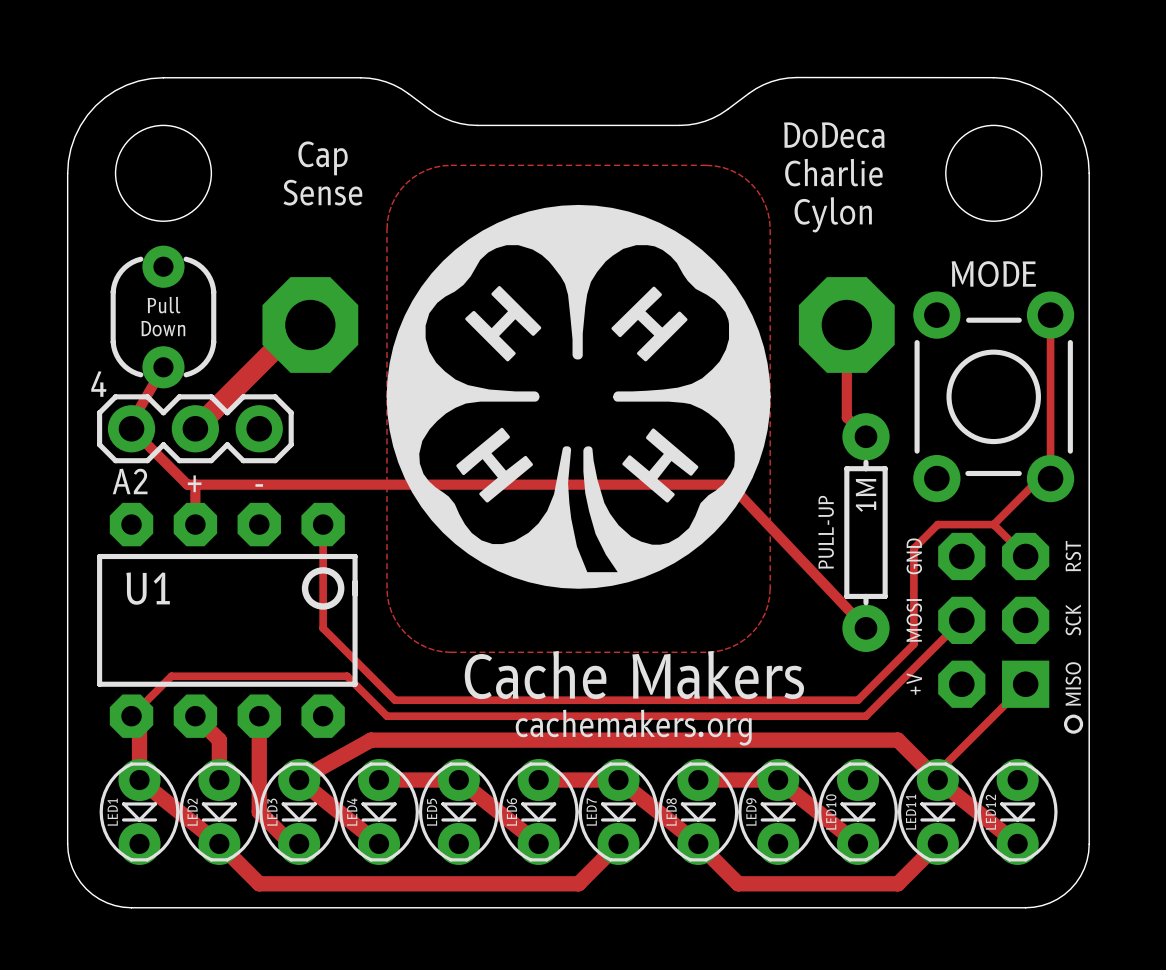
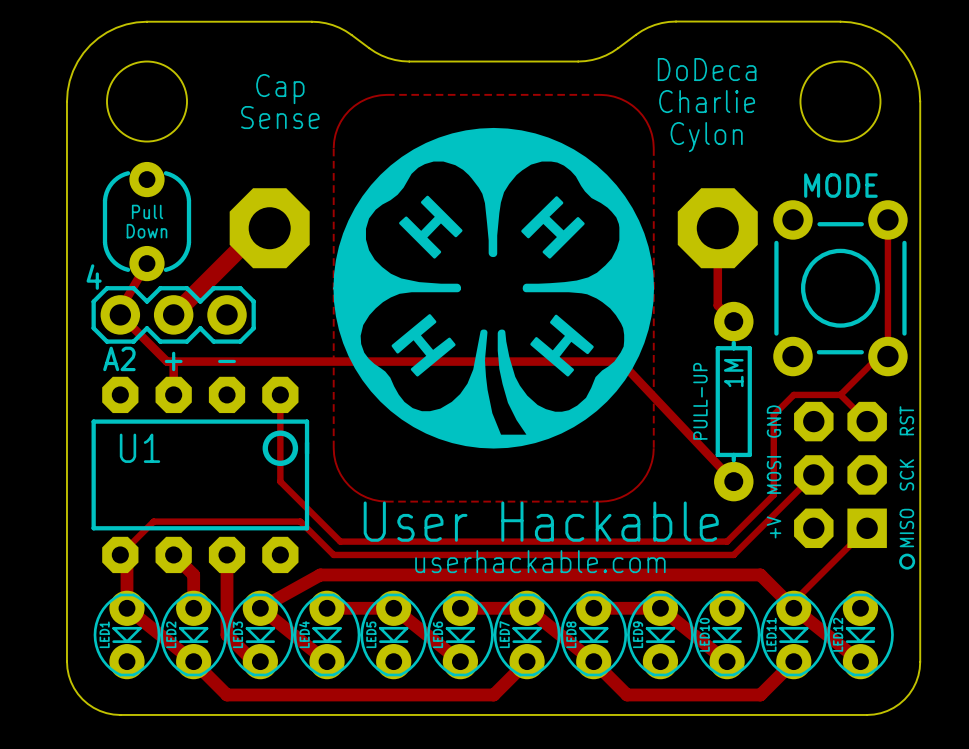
text: Cache Makers (634, 675) -> User Hackable (541, 521)
text: cachemakers.org (633, 727) -> userhackable.com (540, 561)

